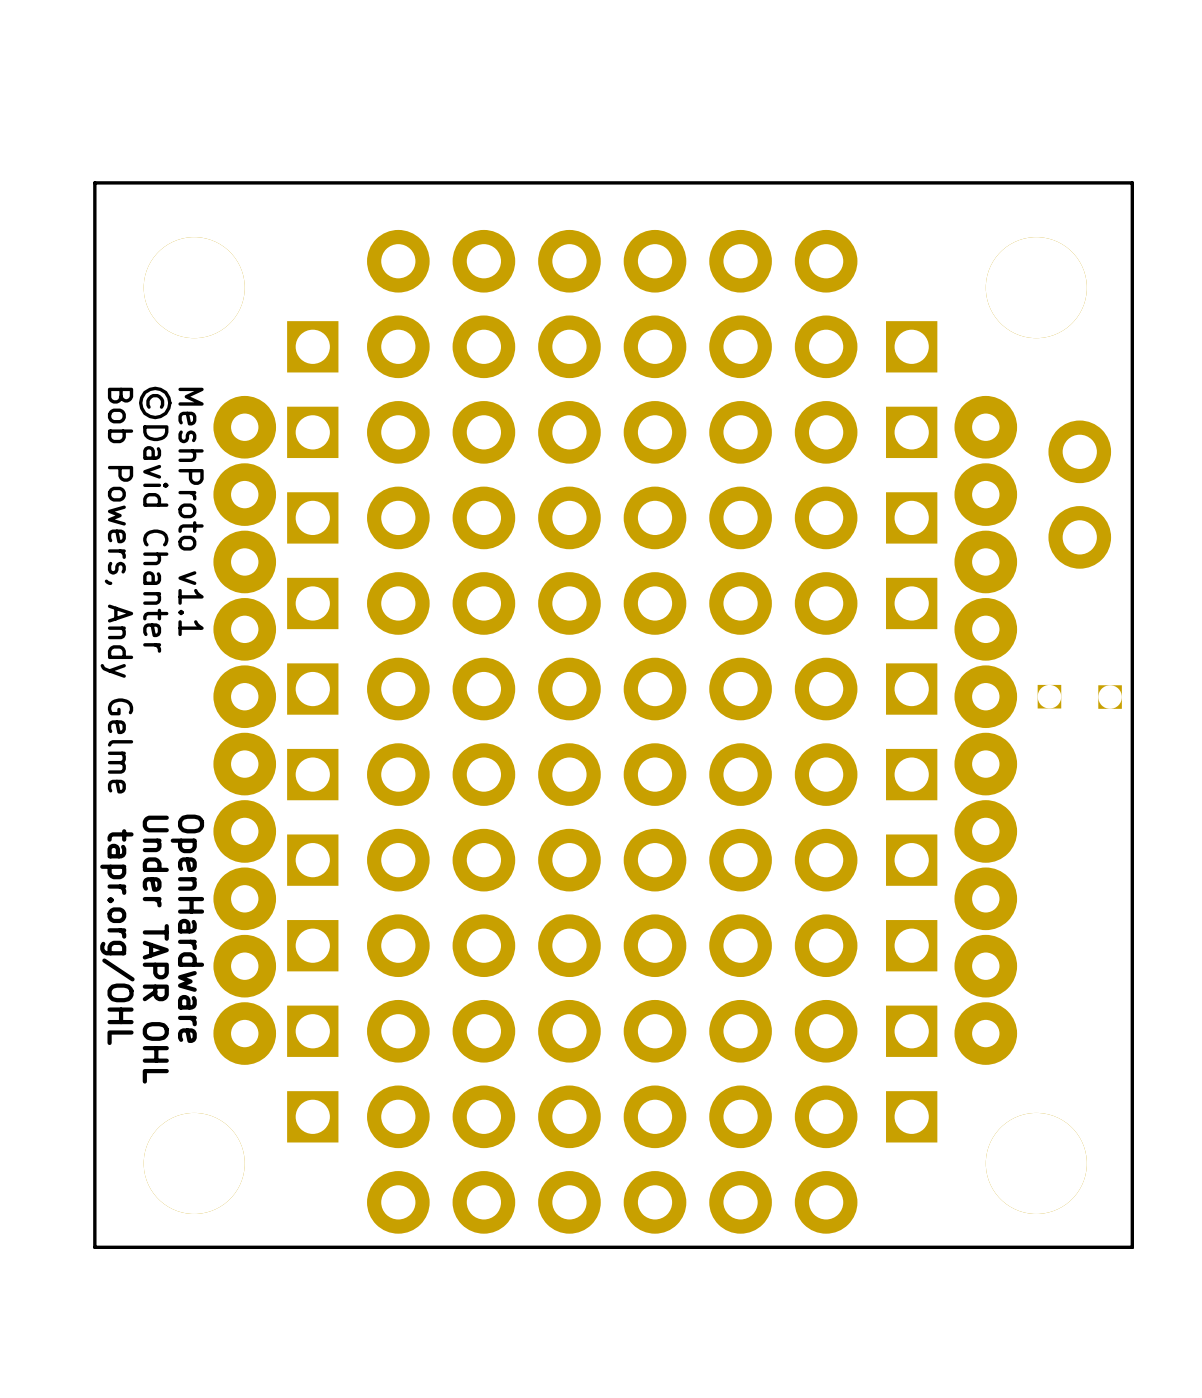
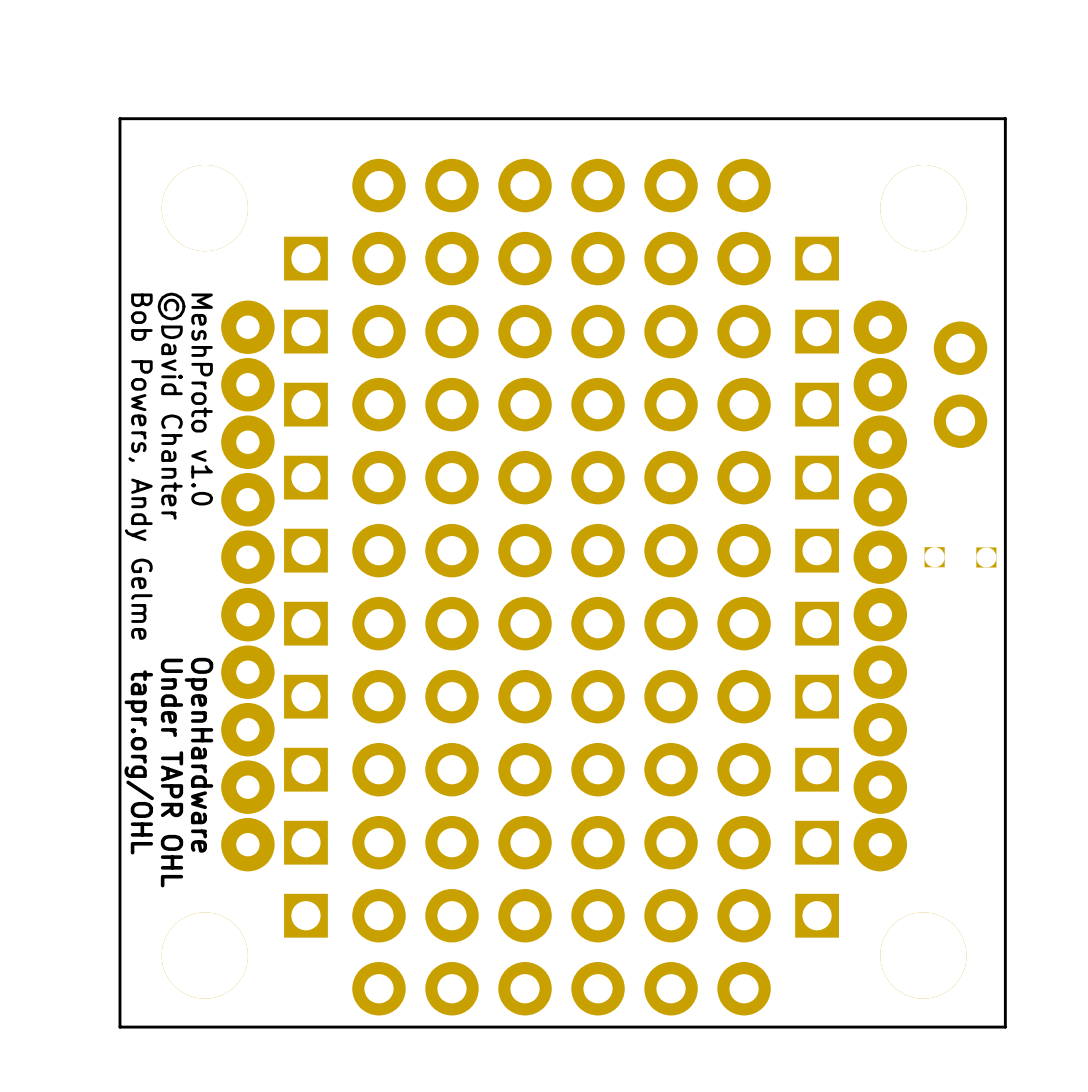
text: MeshProto v1.1 (191, 511) -> MeshProto v1.0 (202, 399)

